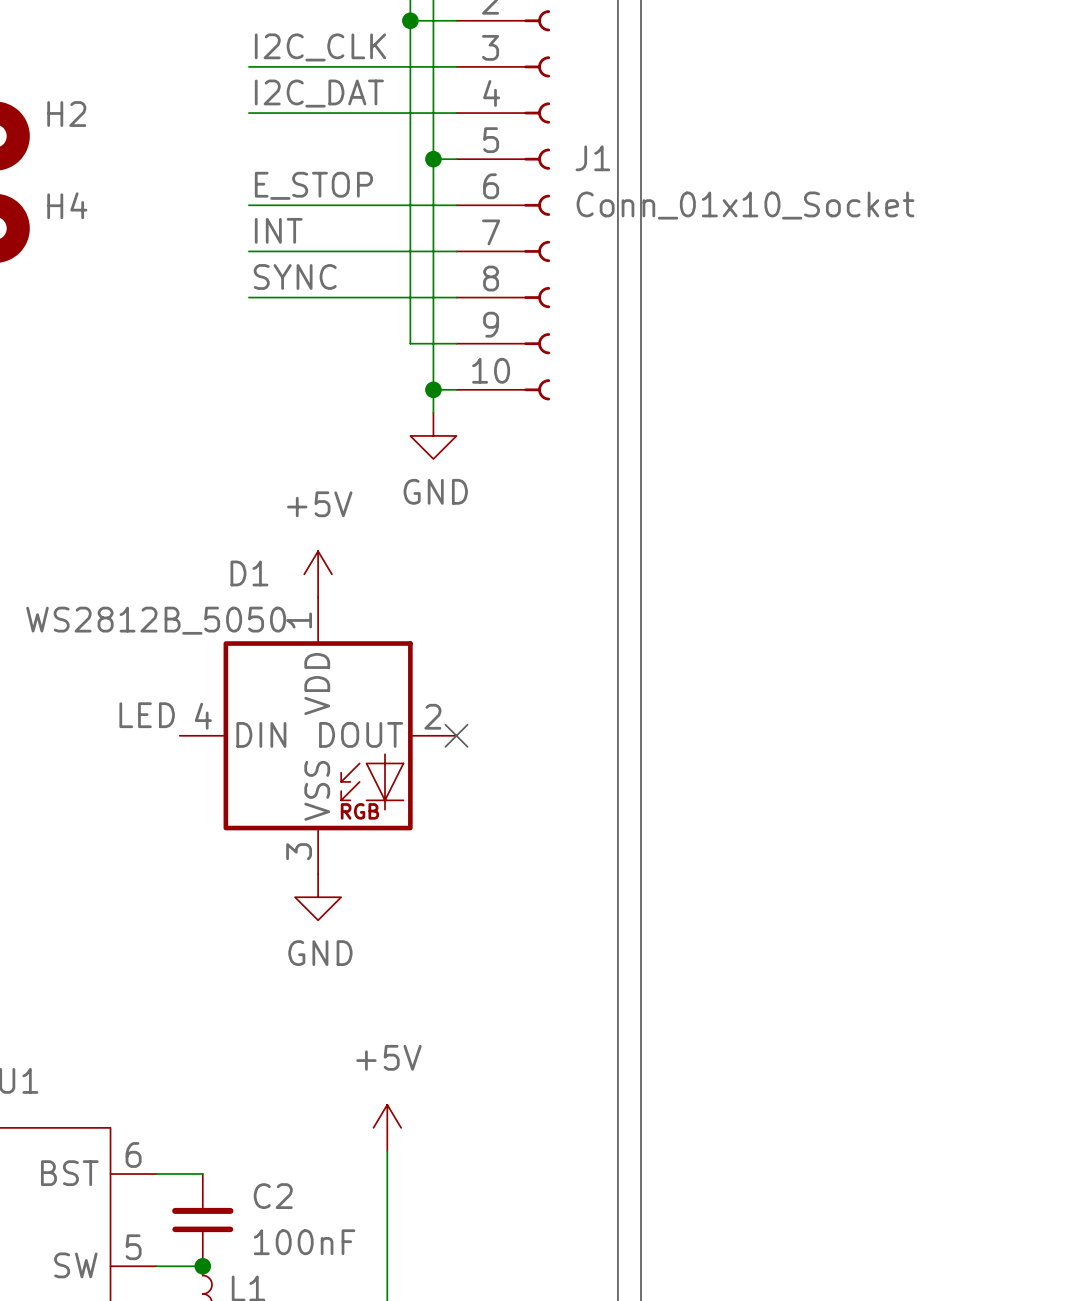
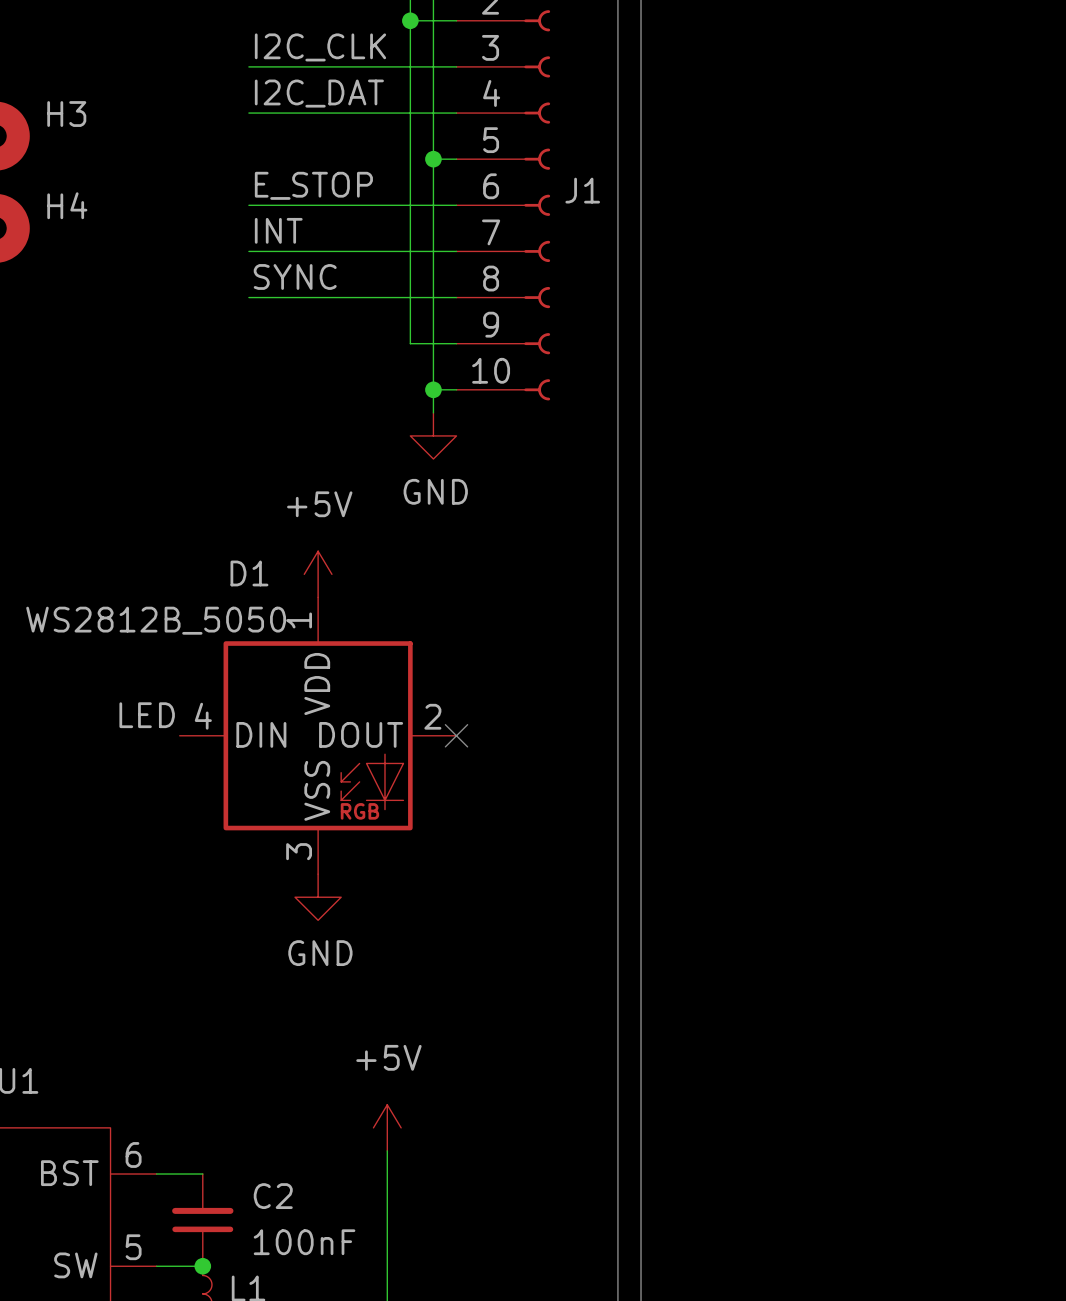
H2 name: H2 (66, 114) -> H3 (66, 114)
J1 name position: J1 (592, 158) -> J1 (582, 190)
J1 value: Conn_01x10_Socket (745, 205) -> none

